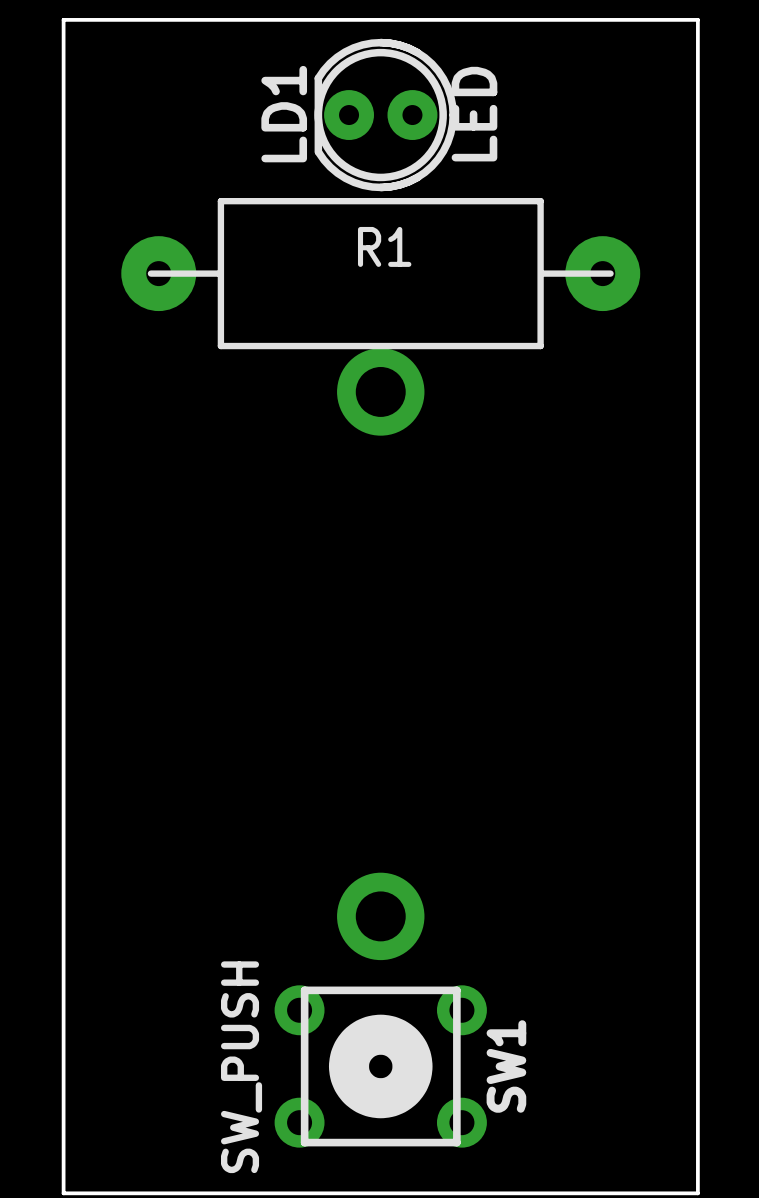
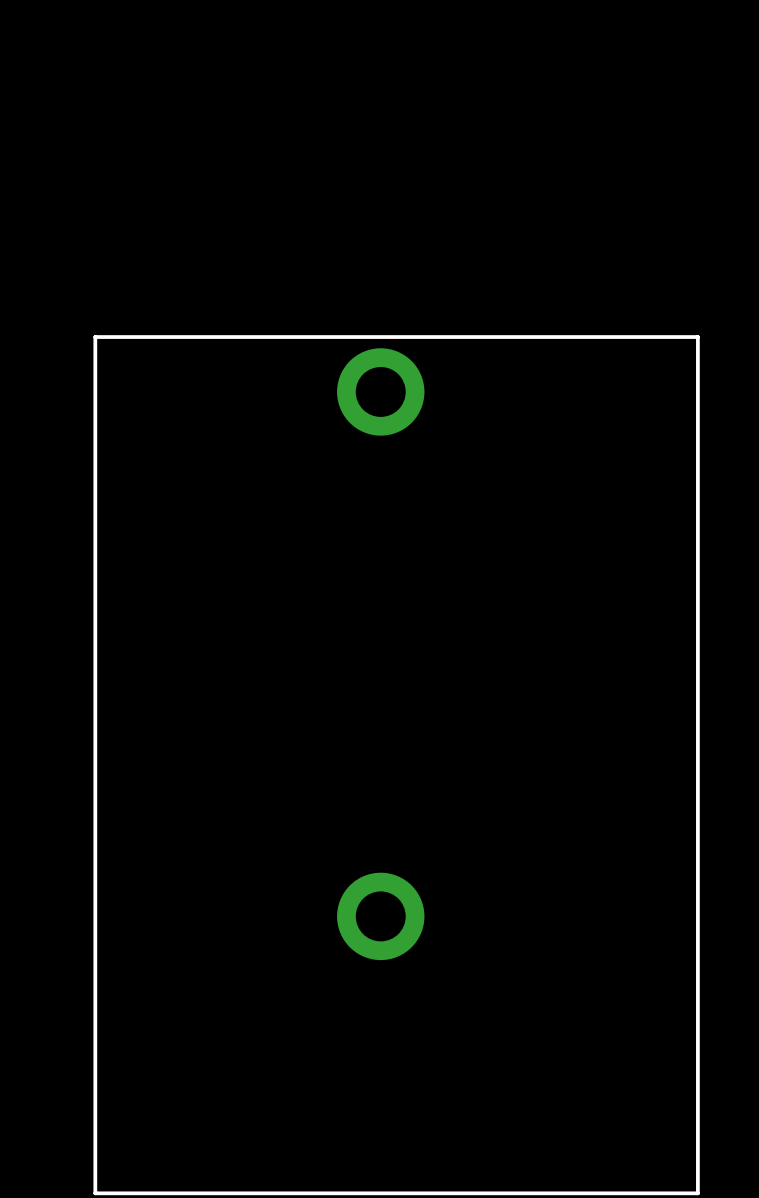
LD1: LED (385, 115) -> none
R1: (380, 273) -> none
board edge: (697, 337) (697, 19) (63, 19) (63, 1193) (95, 1193) -> (697, 337) (95, 337) (95, 1193)
SW1: SW_PUSH (380, 1066) -> none

